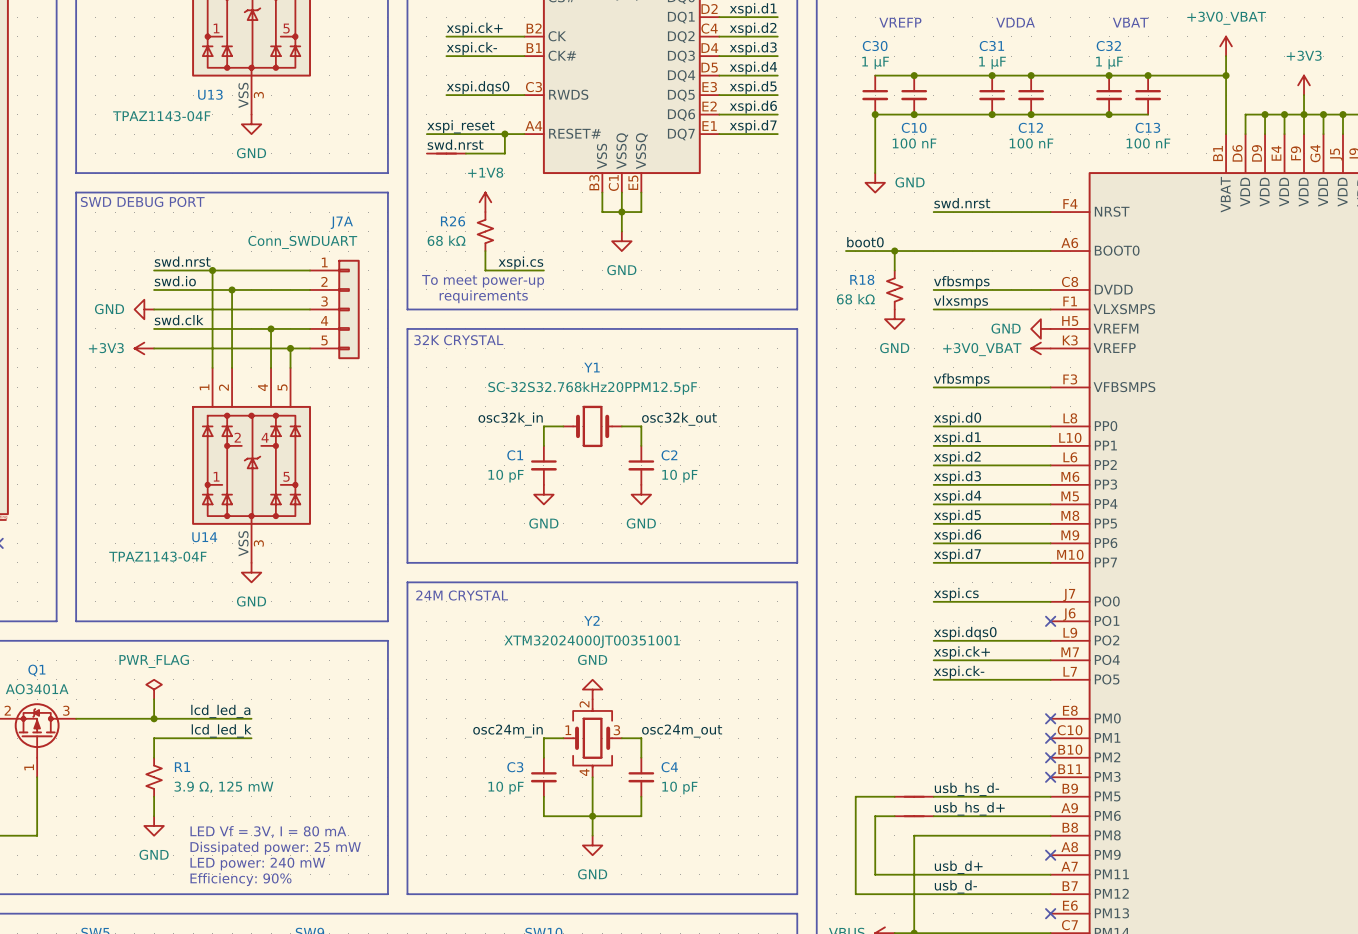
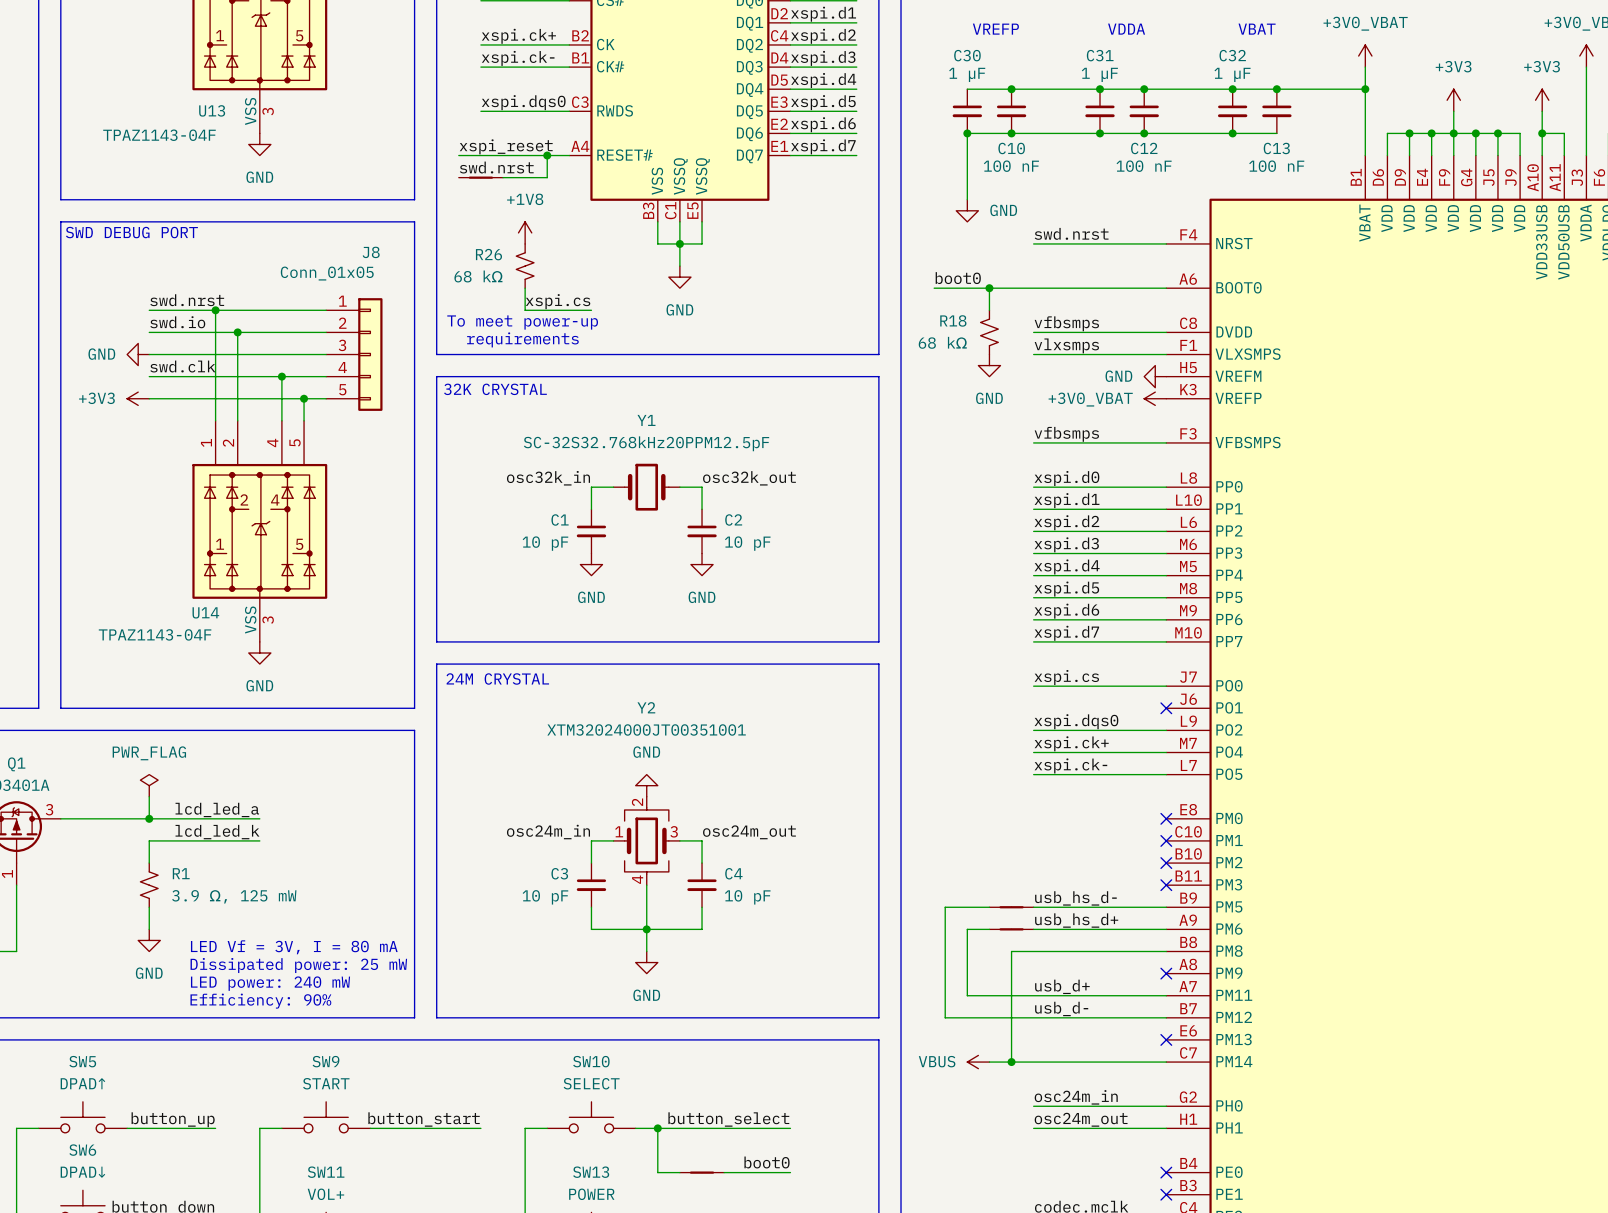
J7A name: J7A (341, 222) -> J8 (371, 252)
J7A value: Conn_SWDUART (302, 242) -> Conn_01x05 (327, 273)

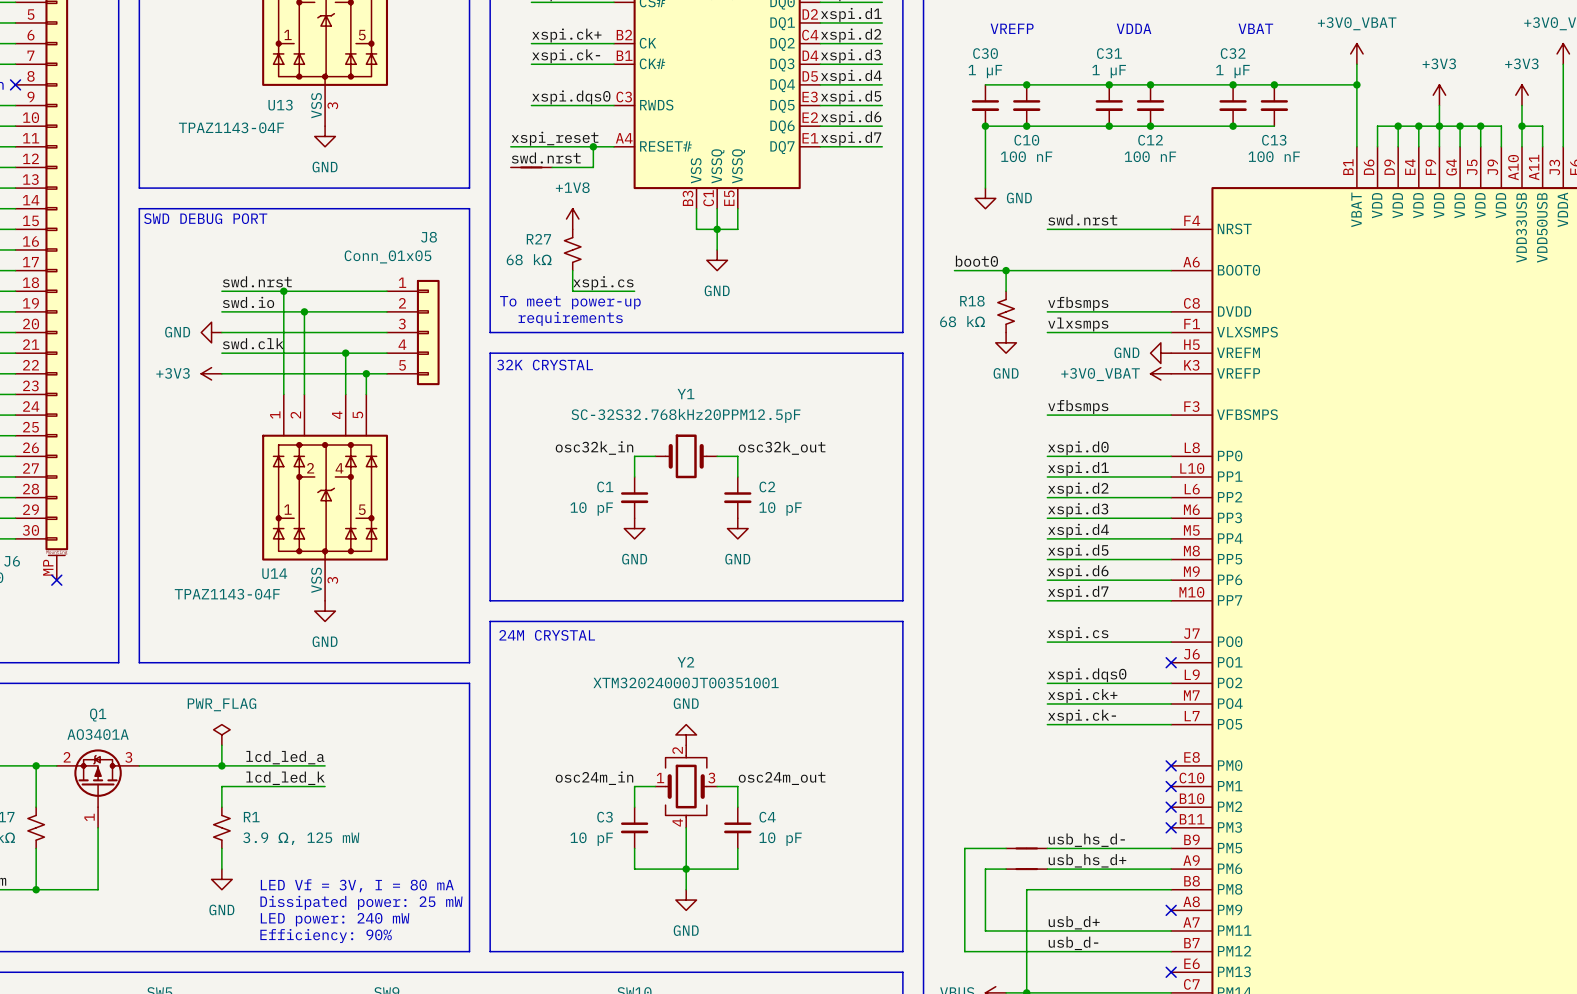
R26 name: R26 (488, 254) -> R27 (538, 239)

